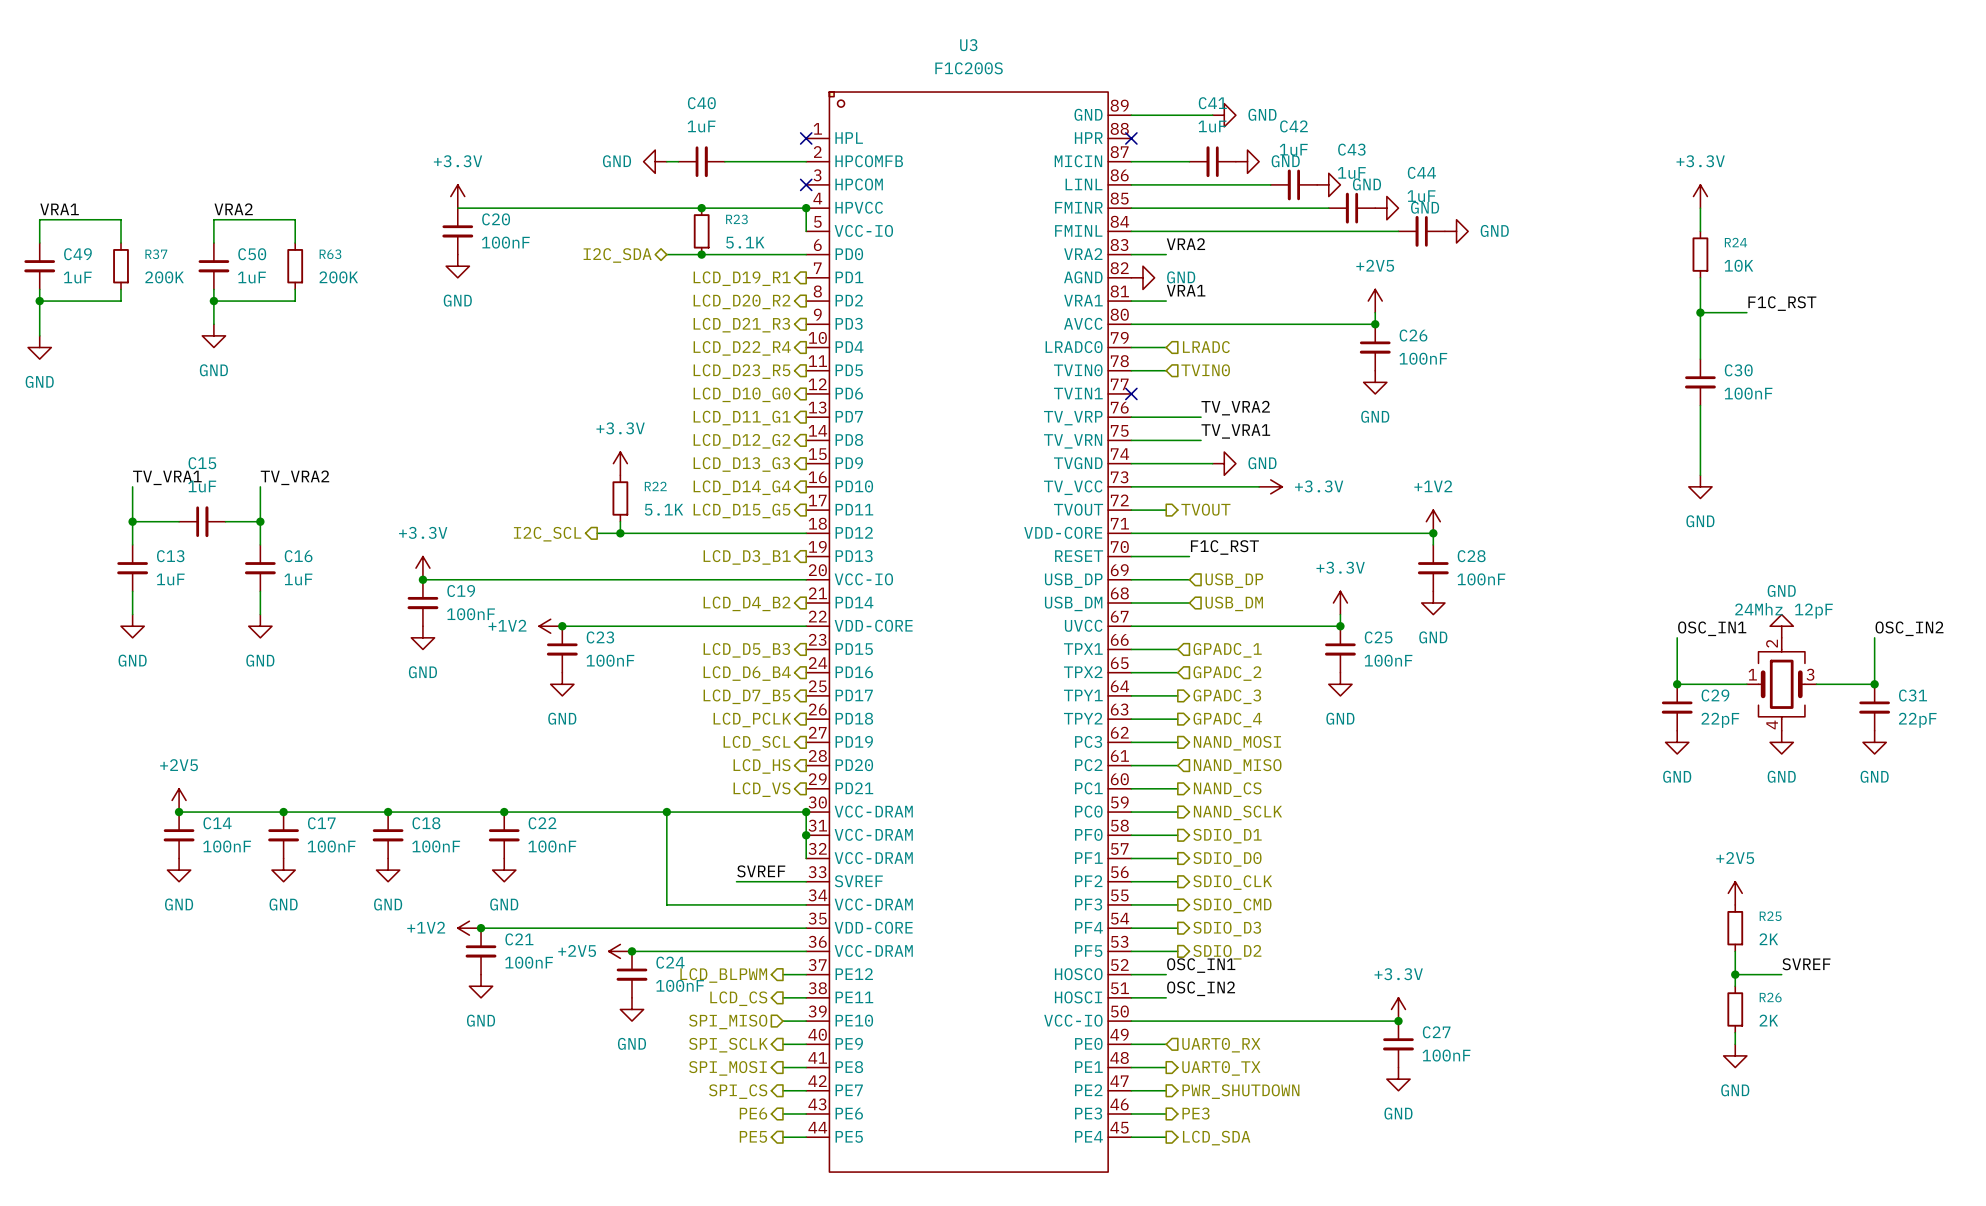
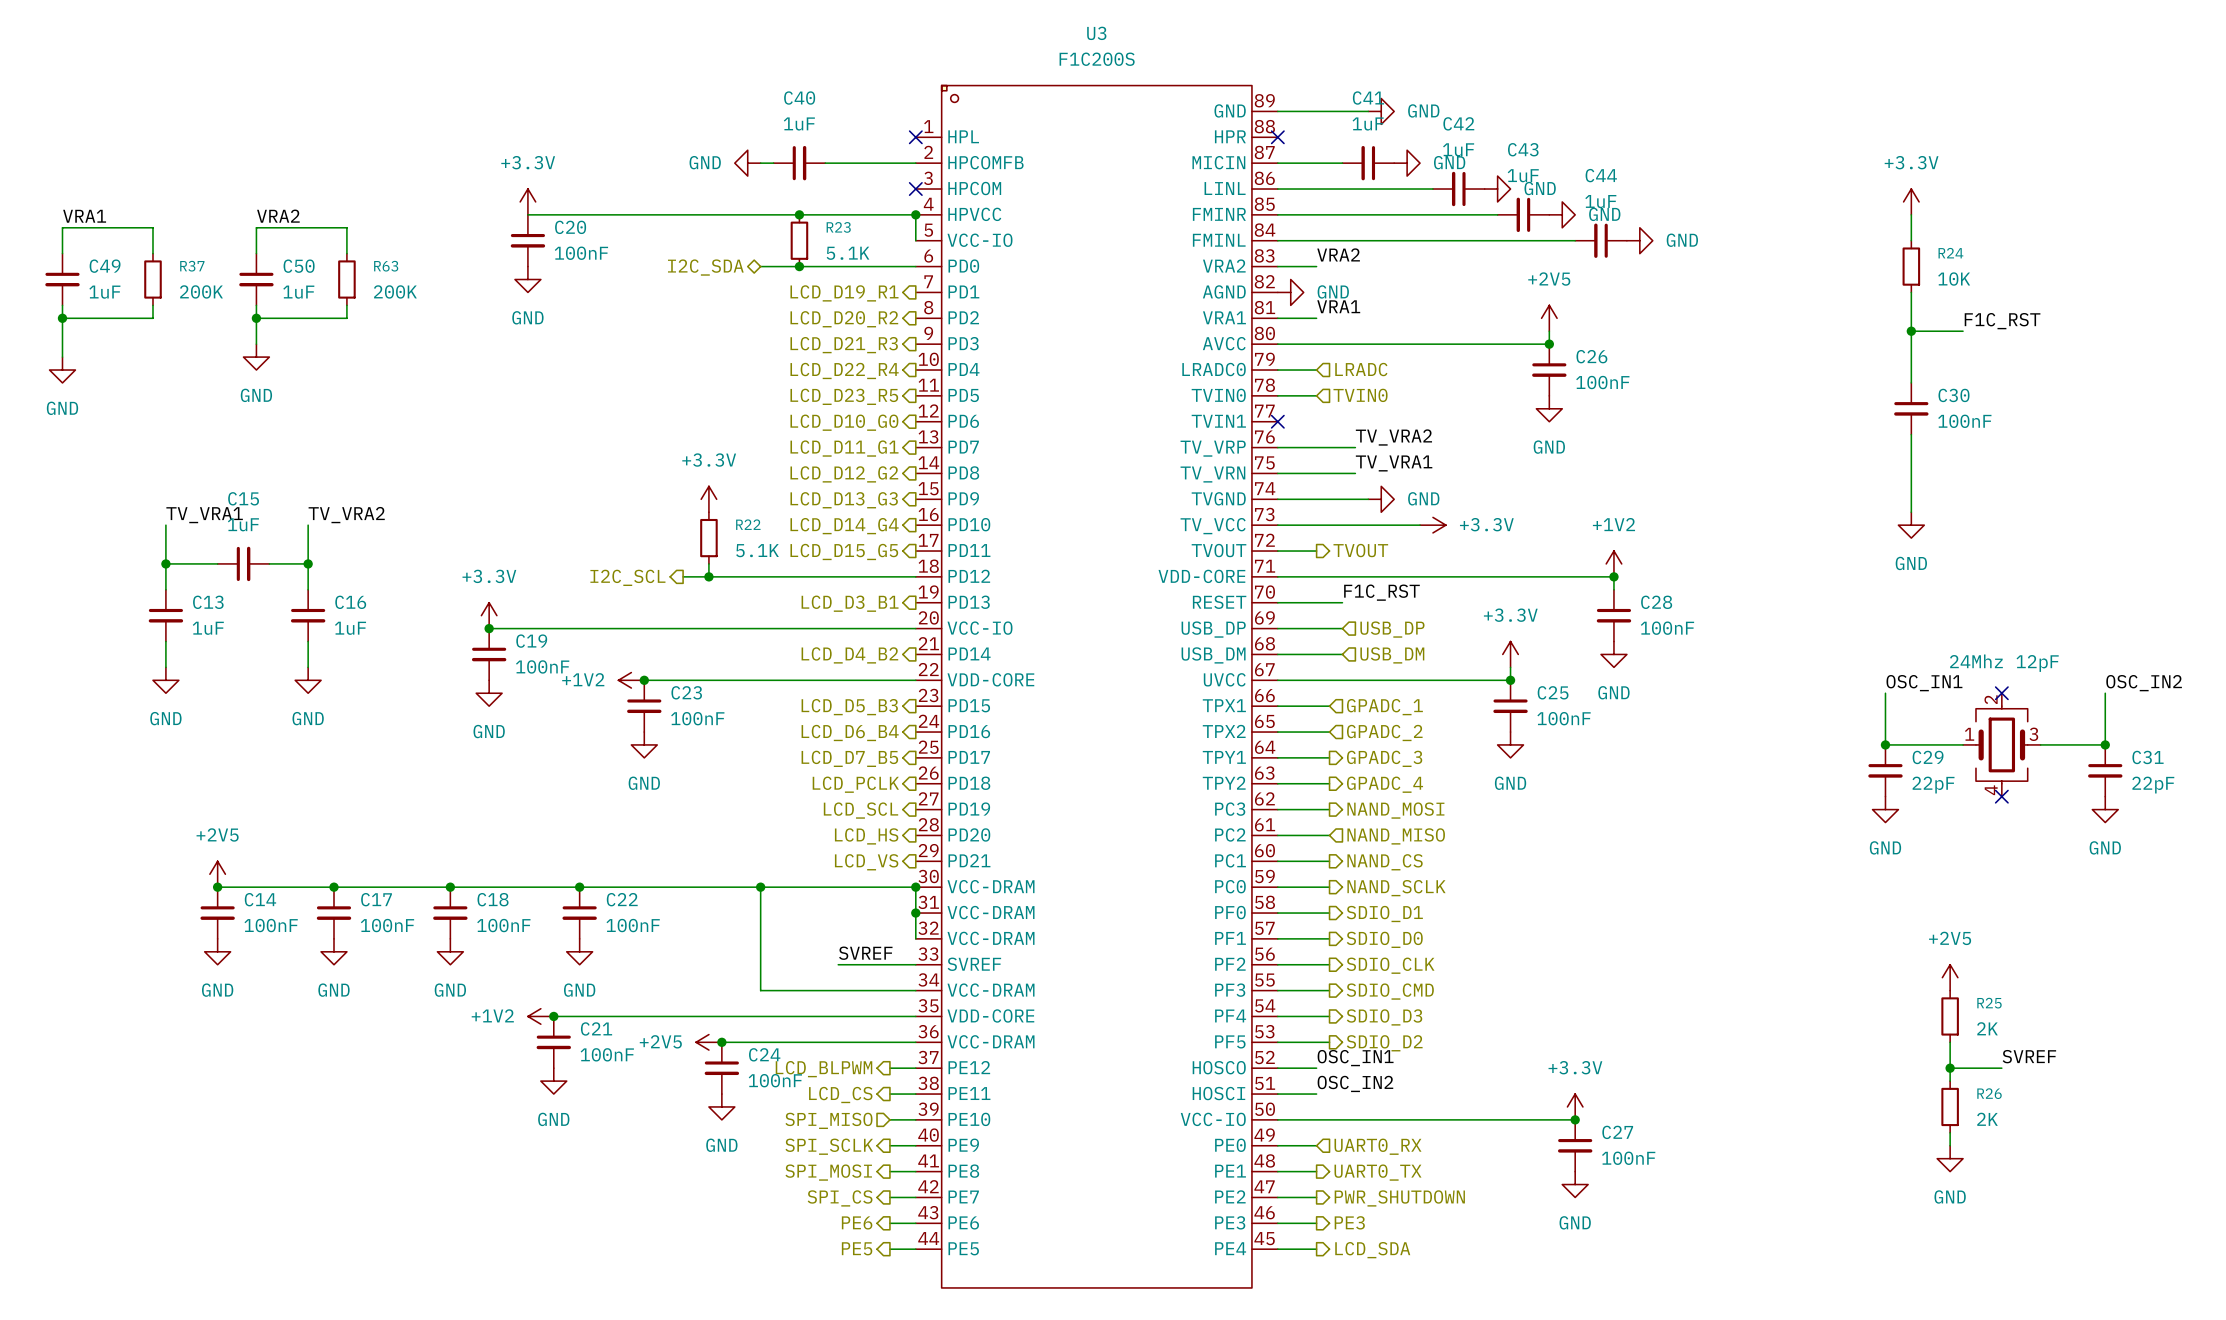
power symbol: GND (1781, 626) -> none
no-connect mark: none -> (2001, 693)
no-connect mark: none -> (2001, 796)
power symbol: GND (1781, 742) -> none

